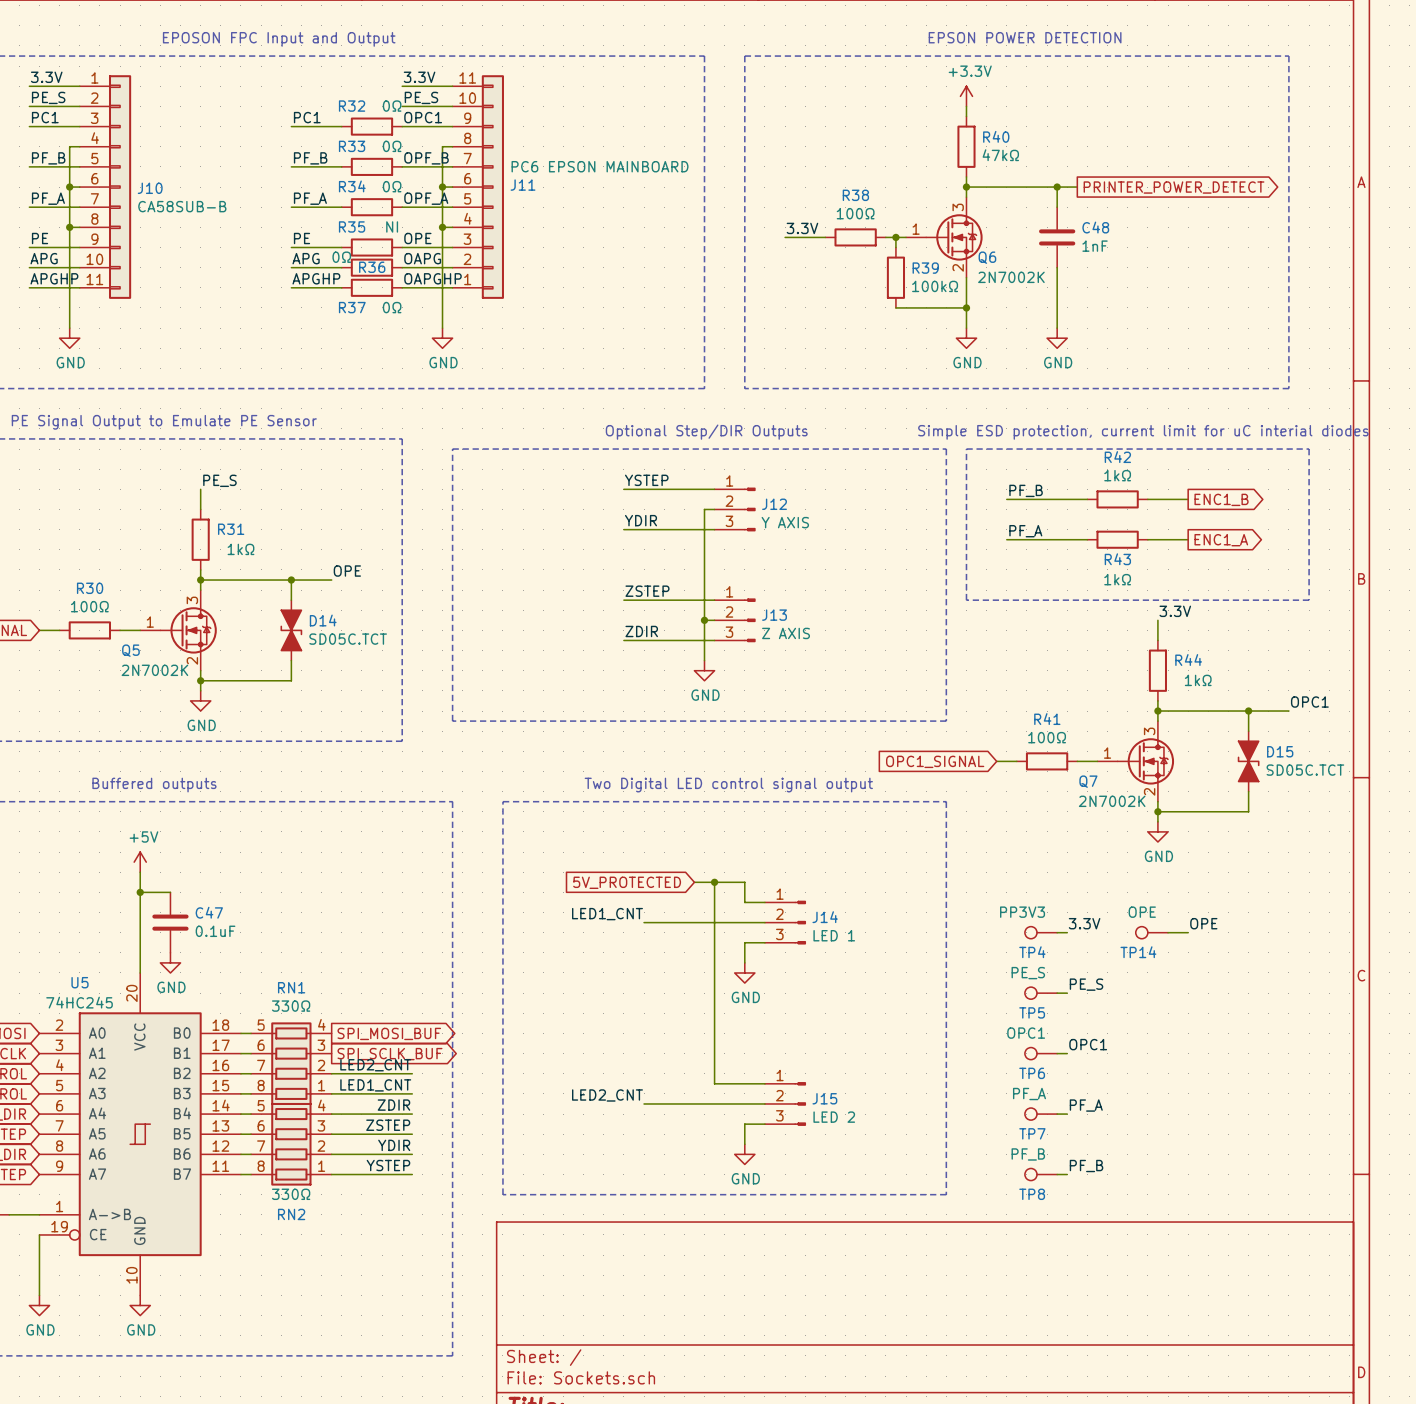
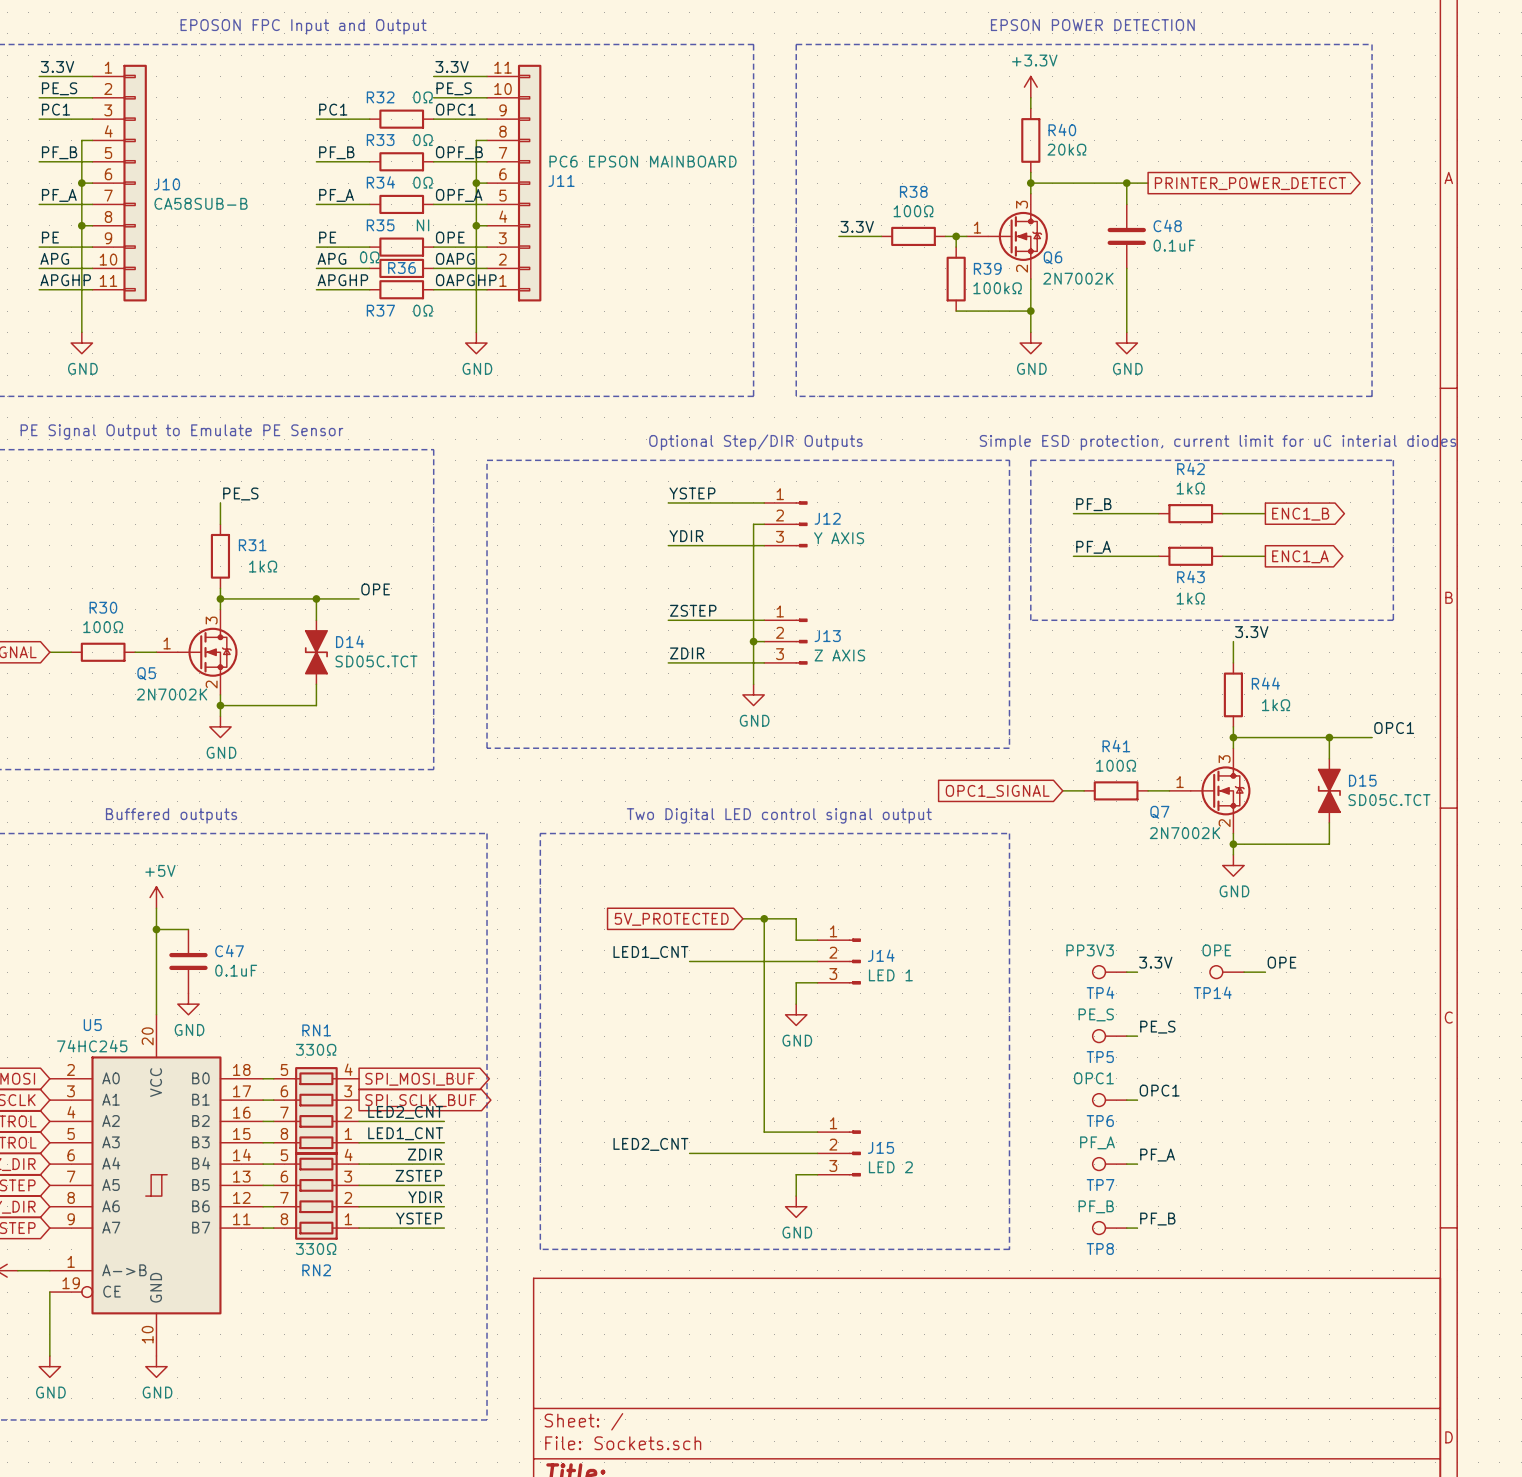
R40 value: 47kΩ (1000, 155) -> 20kΩ (1066, 149)
C48 value: 1nF (1095, 246) -> 0.1uF (1174, 245)

